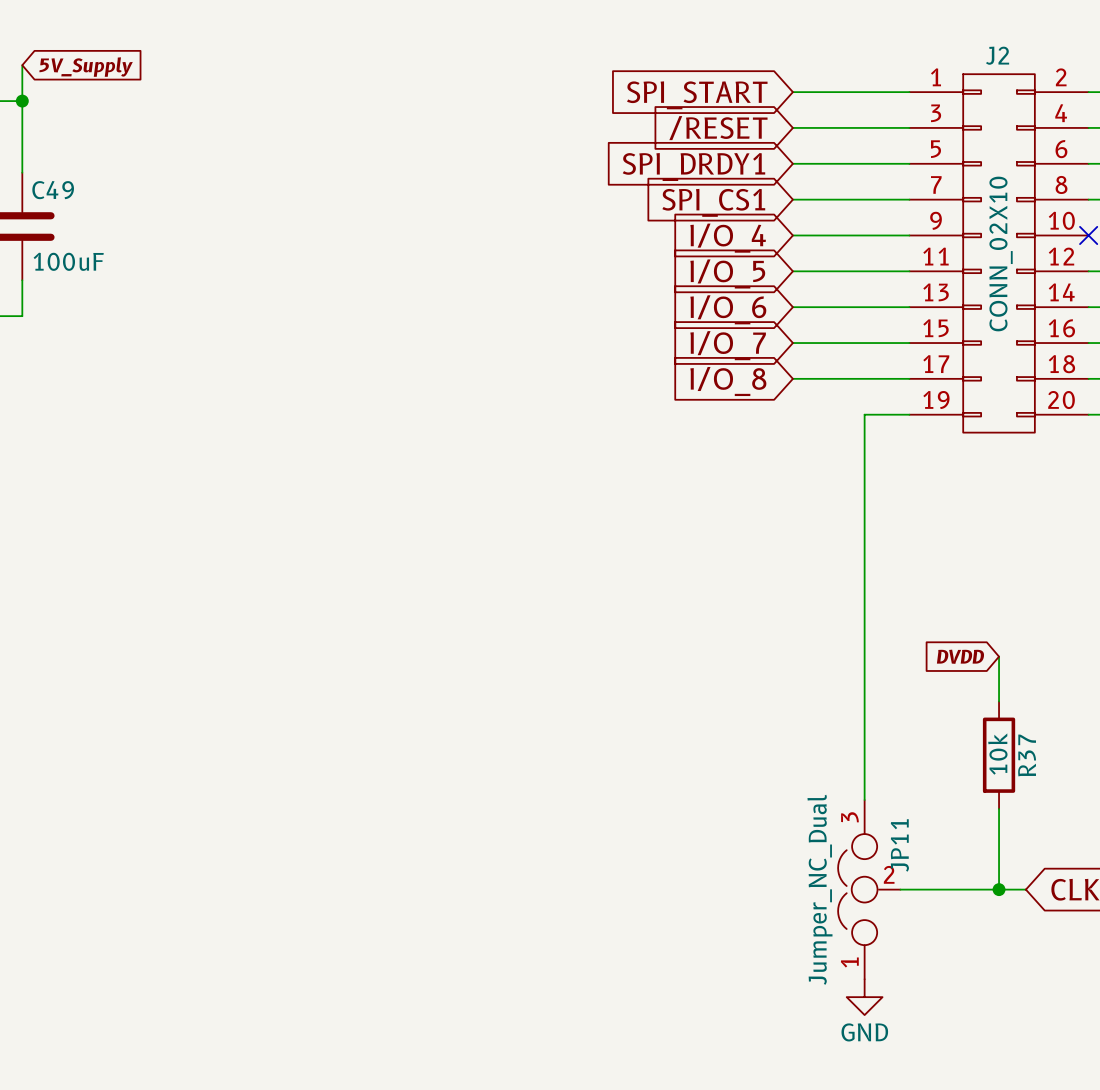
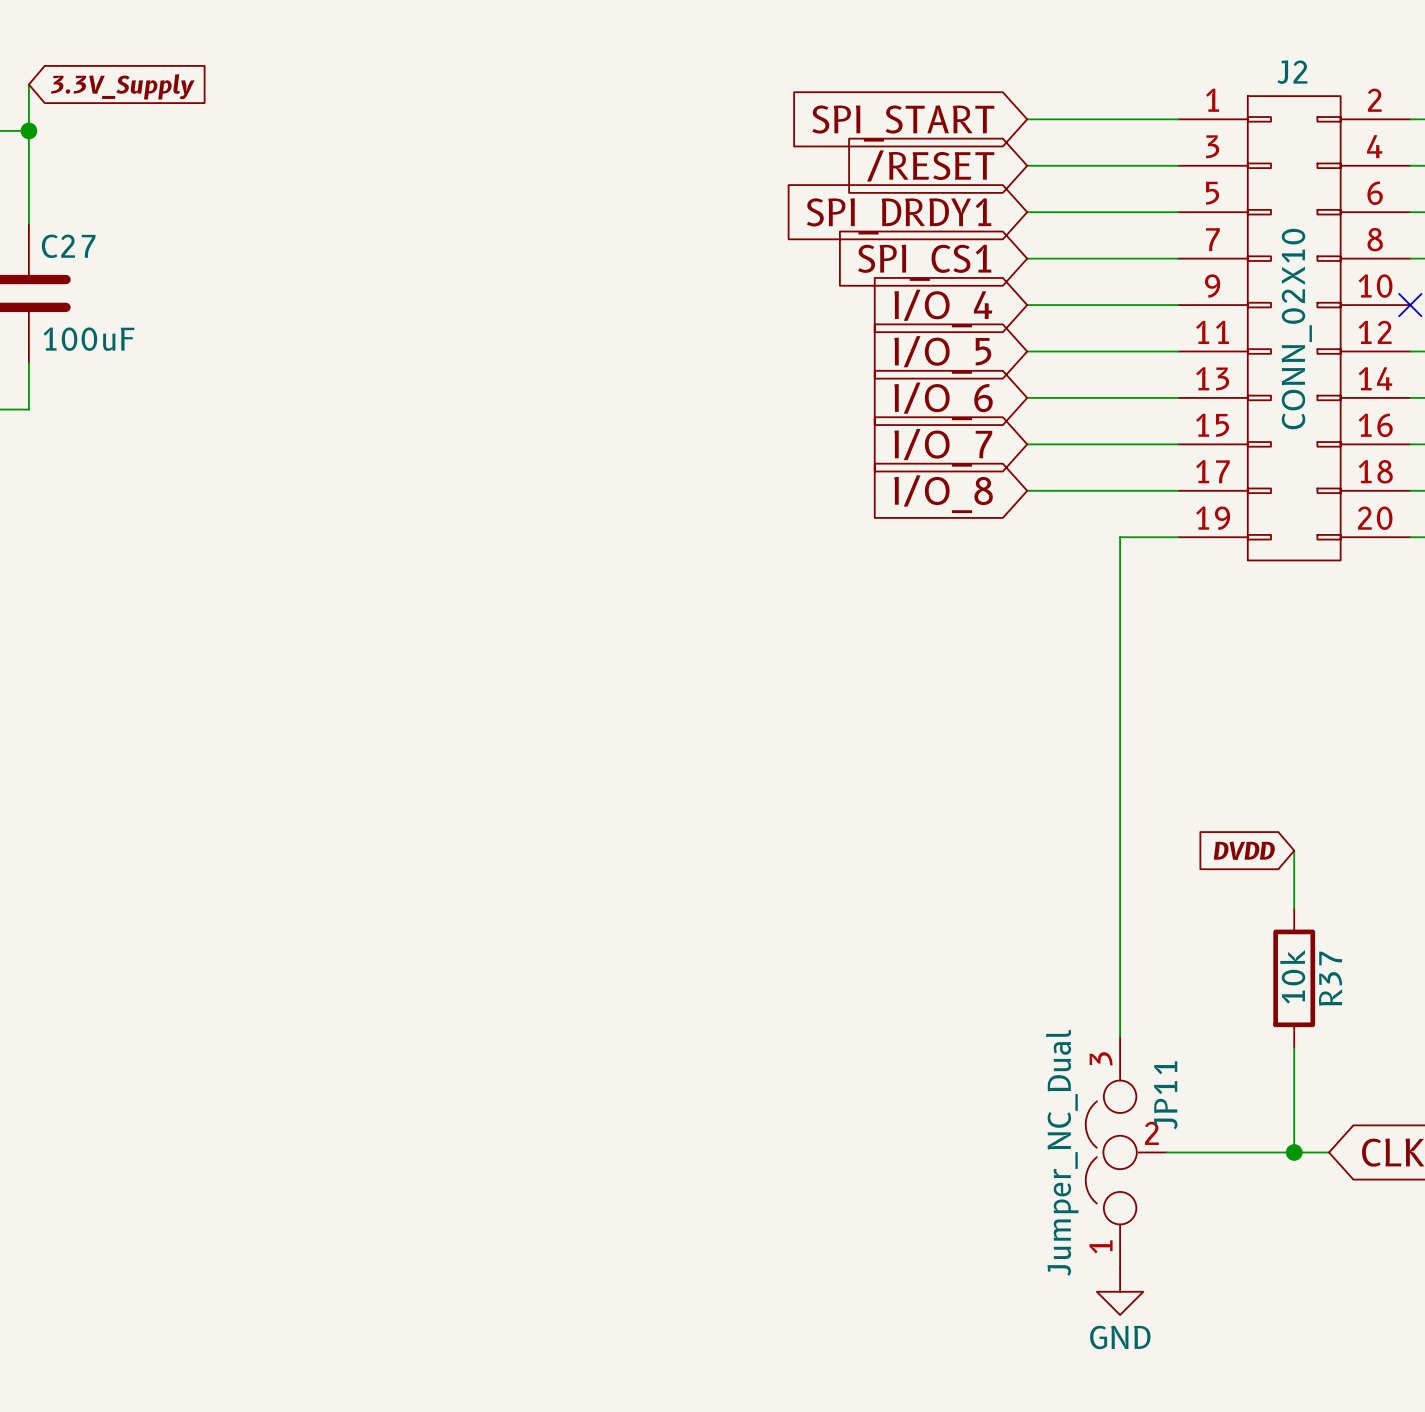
global label: 5V_Supply (86, 67) -> 3.3V_Supply (122, 86)
C49 name: C49 (53, 190) -> C27 (68, 246)

